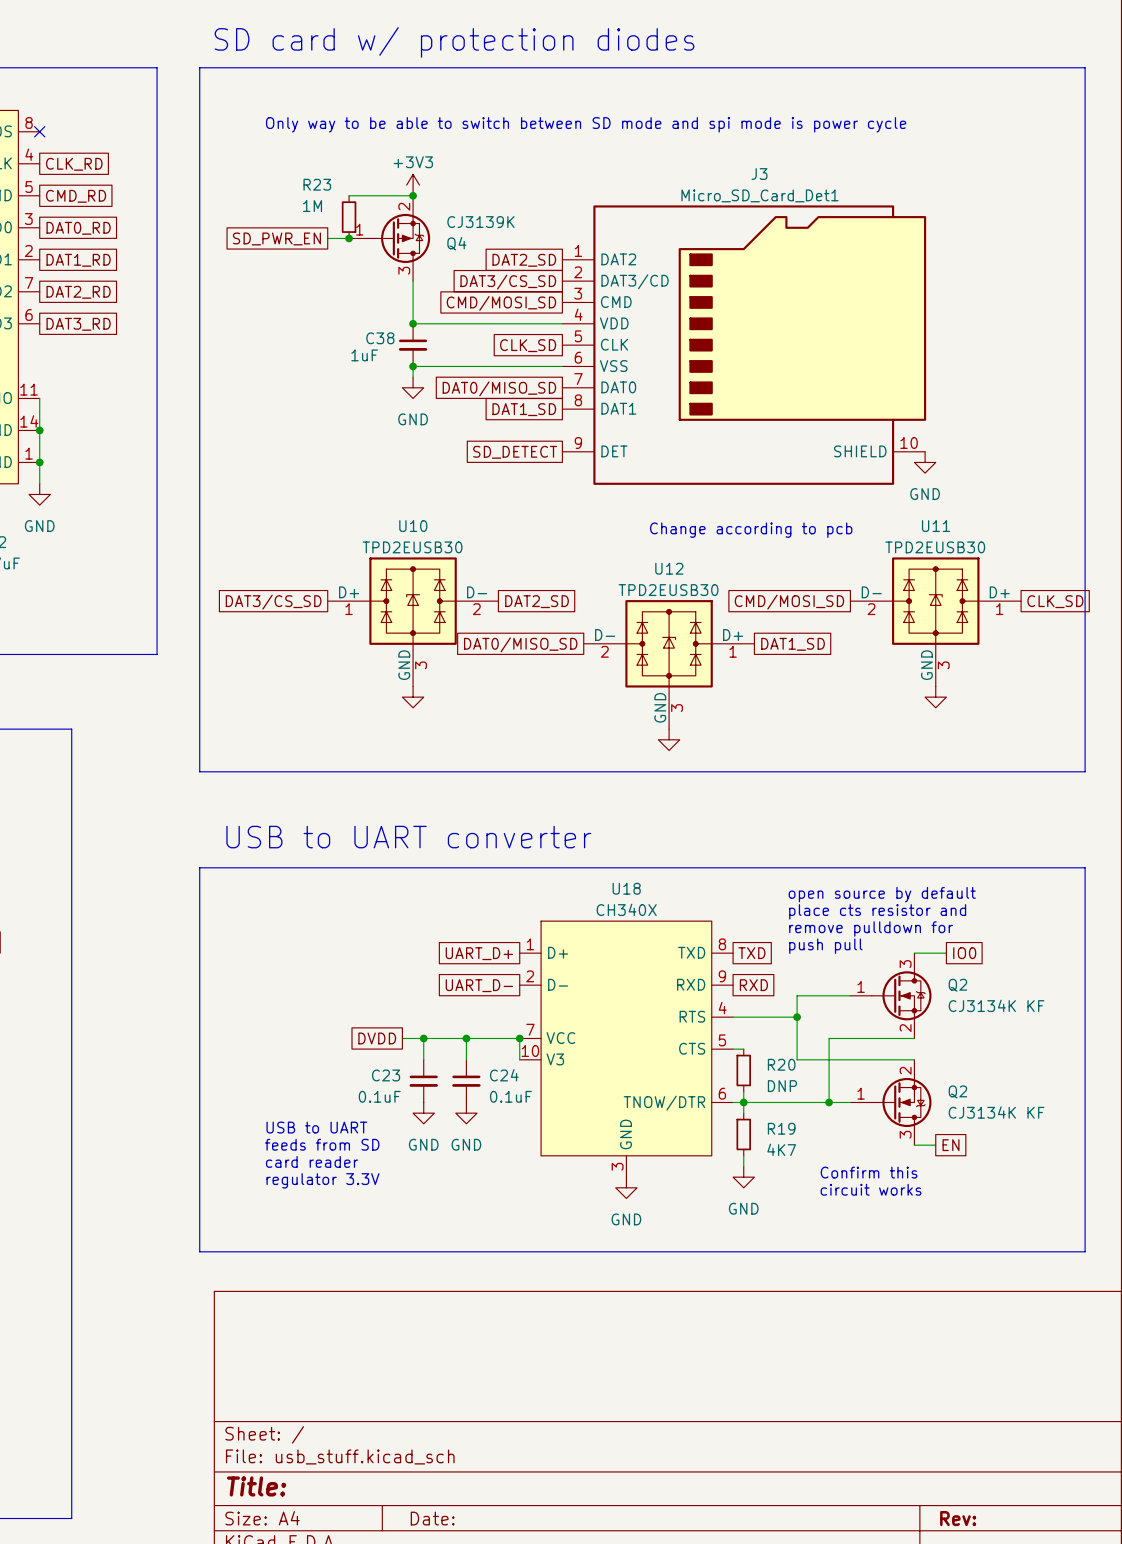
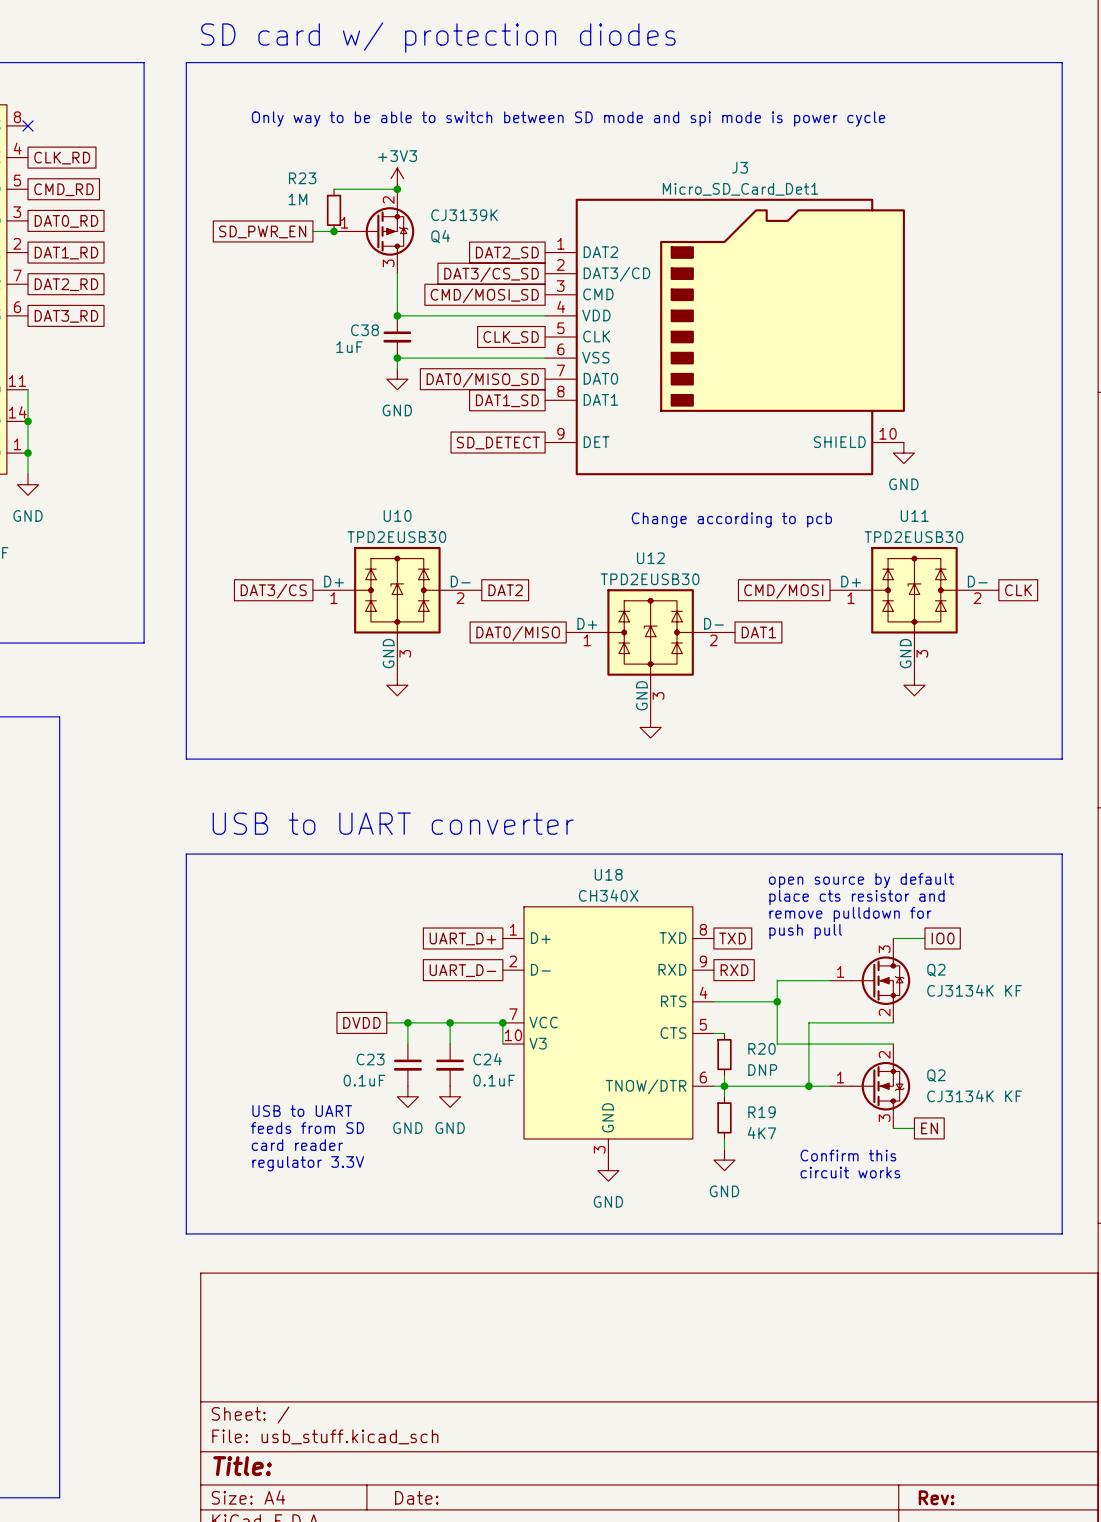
global label: DAT2_SD (537, 601) -> DAT2 (505, 590)
U11 flip: as is (935, 601) -> left-right (914, 590)
global label: CLK_SD (1055, 601) -> CLK (1018, 590)
global label: DAT3/CS_SD (273, 602) -> DAT3/CS (273, 591)
global label: CMD/MOSI_SD (789, 602) -> CMD/MOSI (783, 591)
U12 flip: as is (669, 643) -> left-right (650, 632)
global label: DAT0/MISO_SD (520, 644) -> DAT0/MISO (518, 633)
global label: DAT1_SD (793, 644) -> DAT1 (758, 632)

